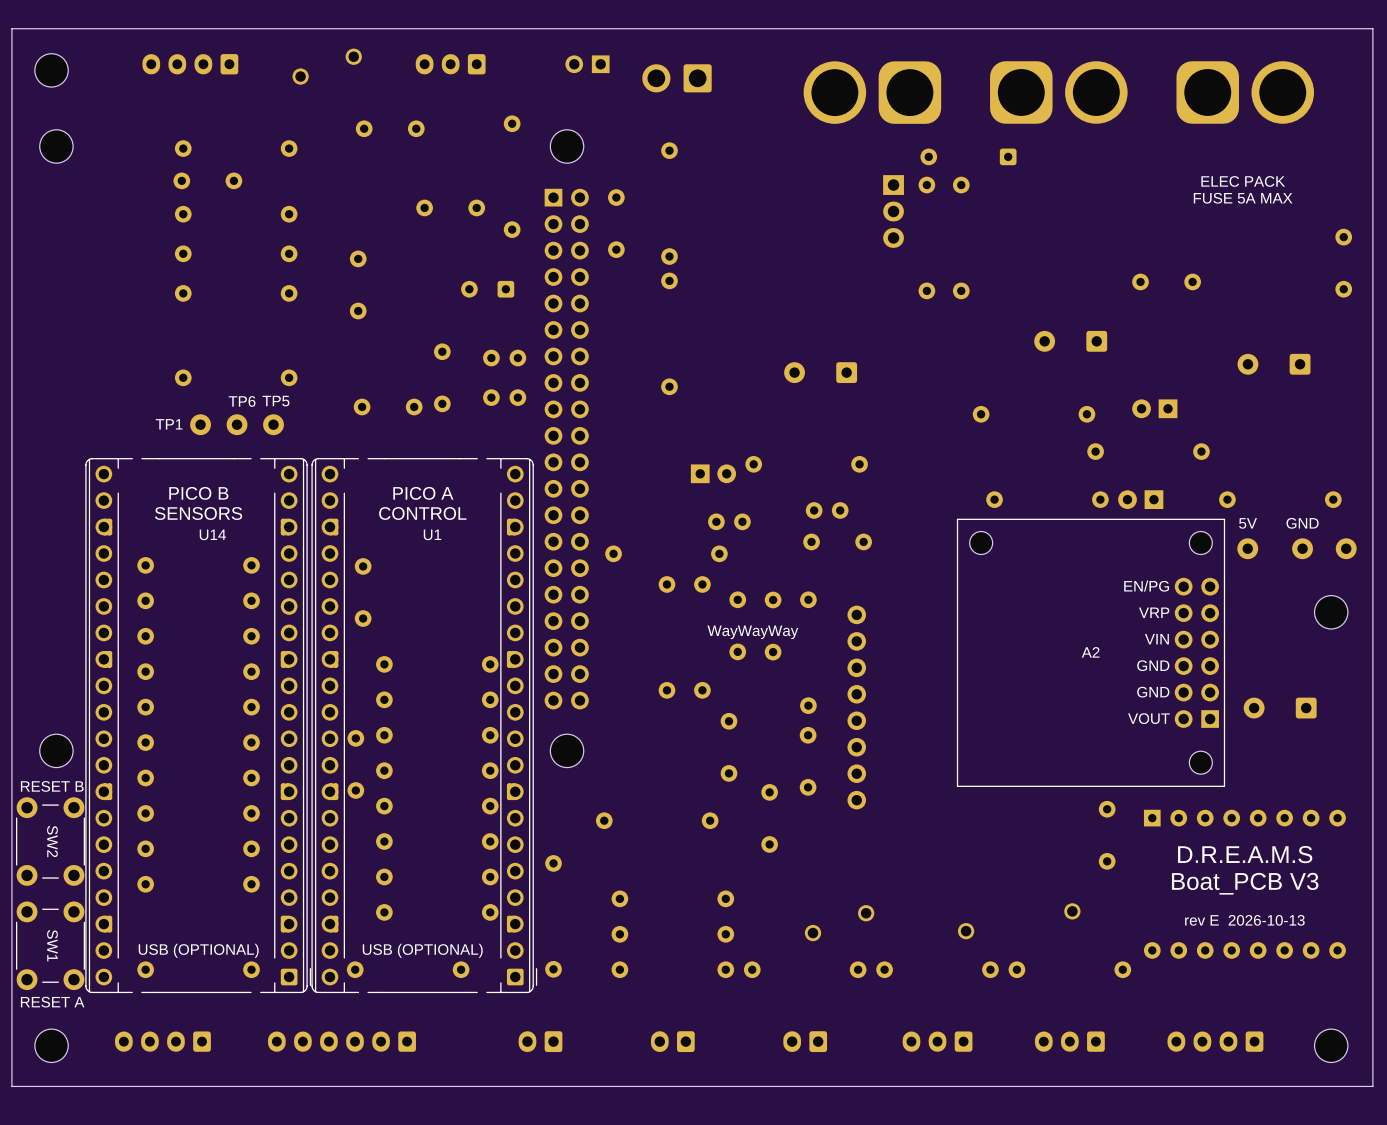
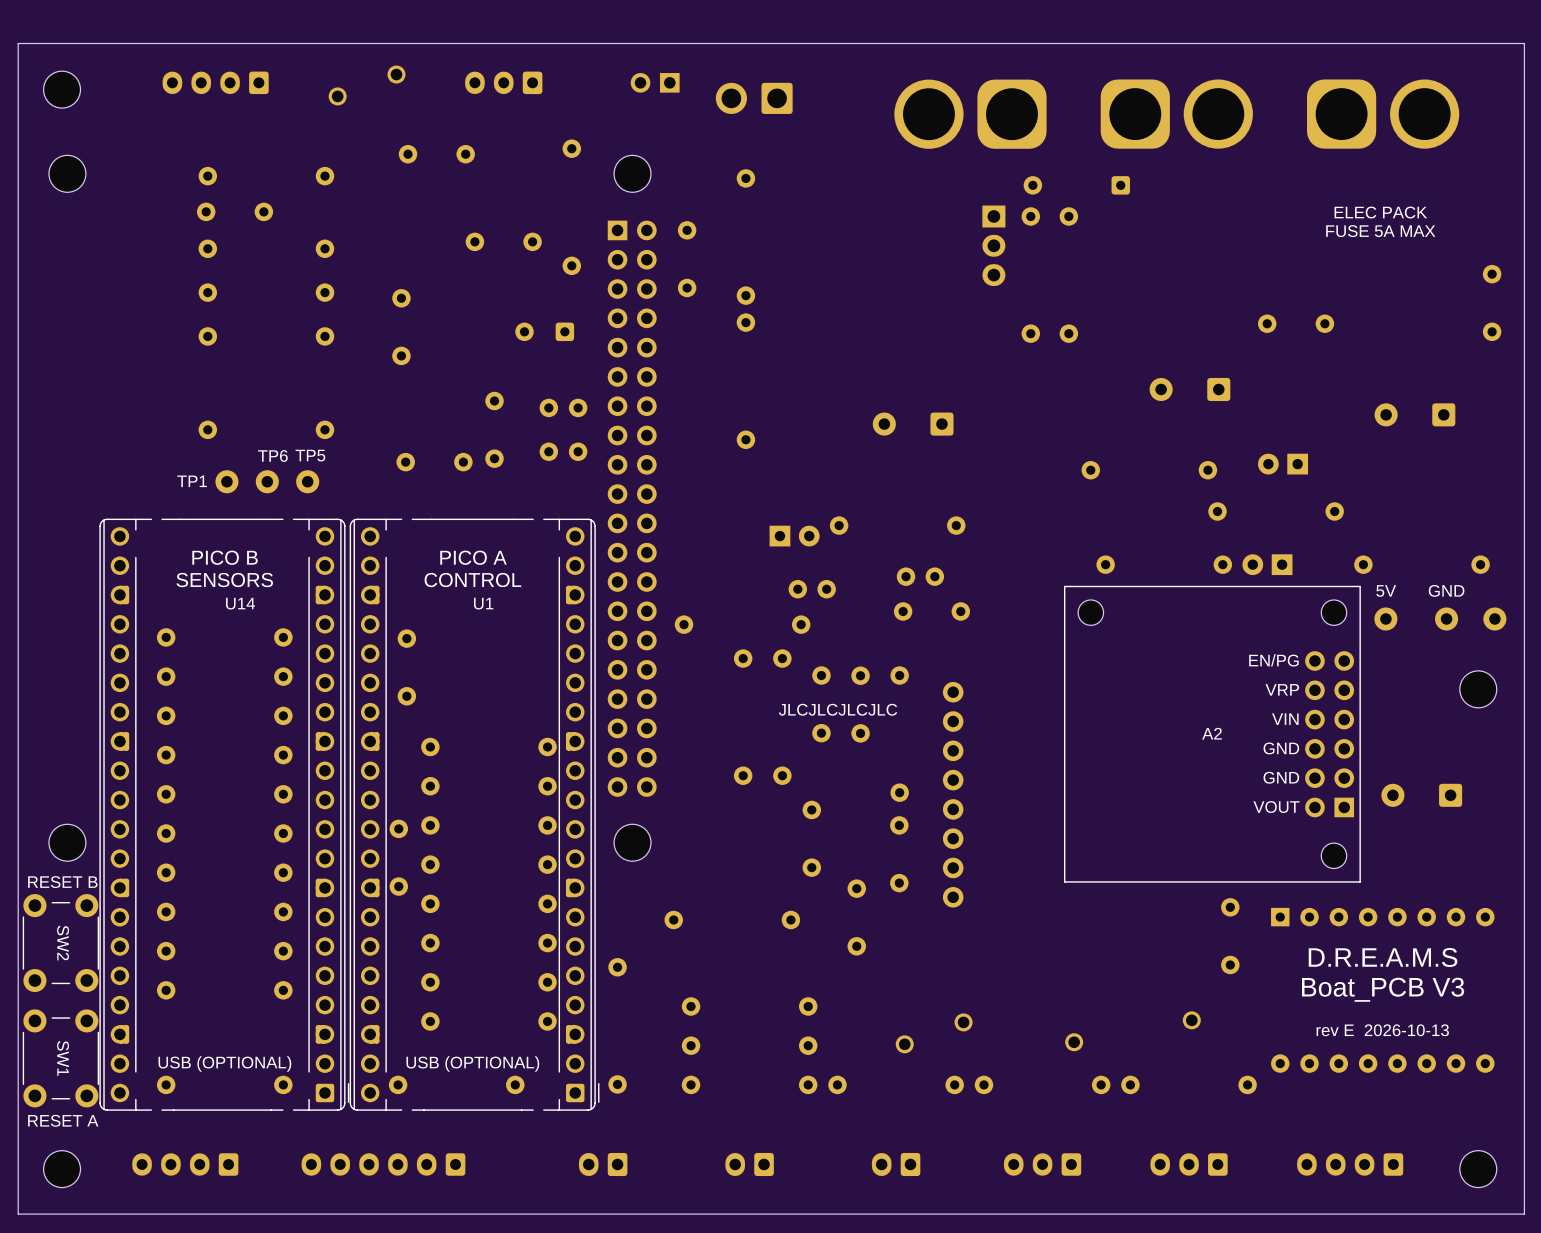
text: WayWayWay (752, 632) -> JLCJLCJLCJLC (838, 709)

